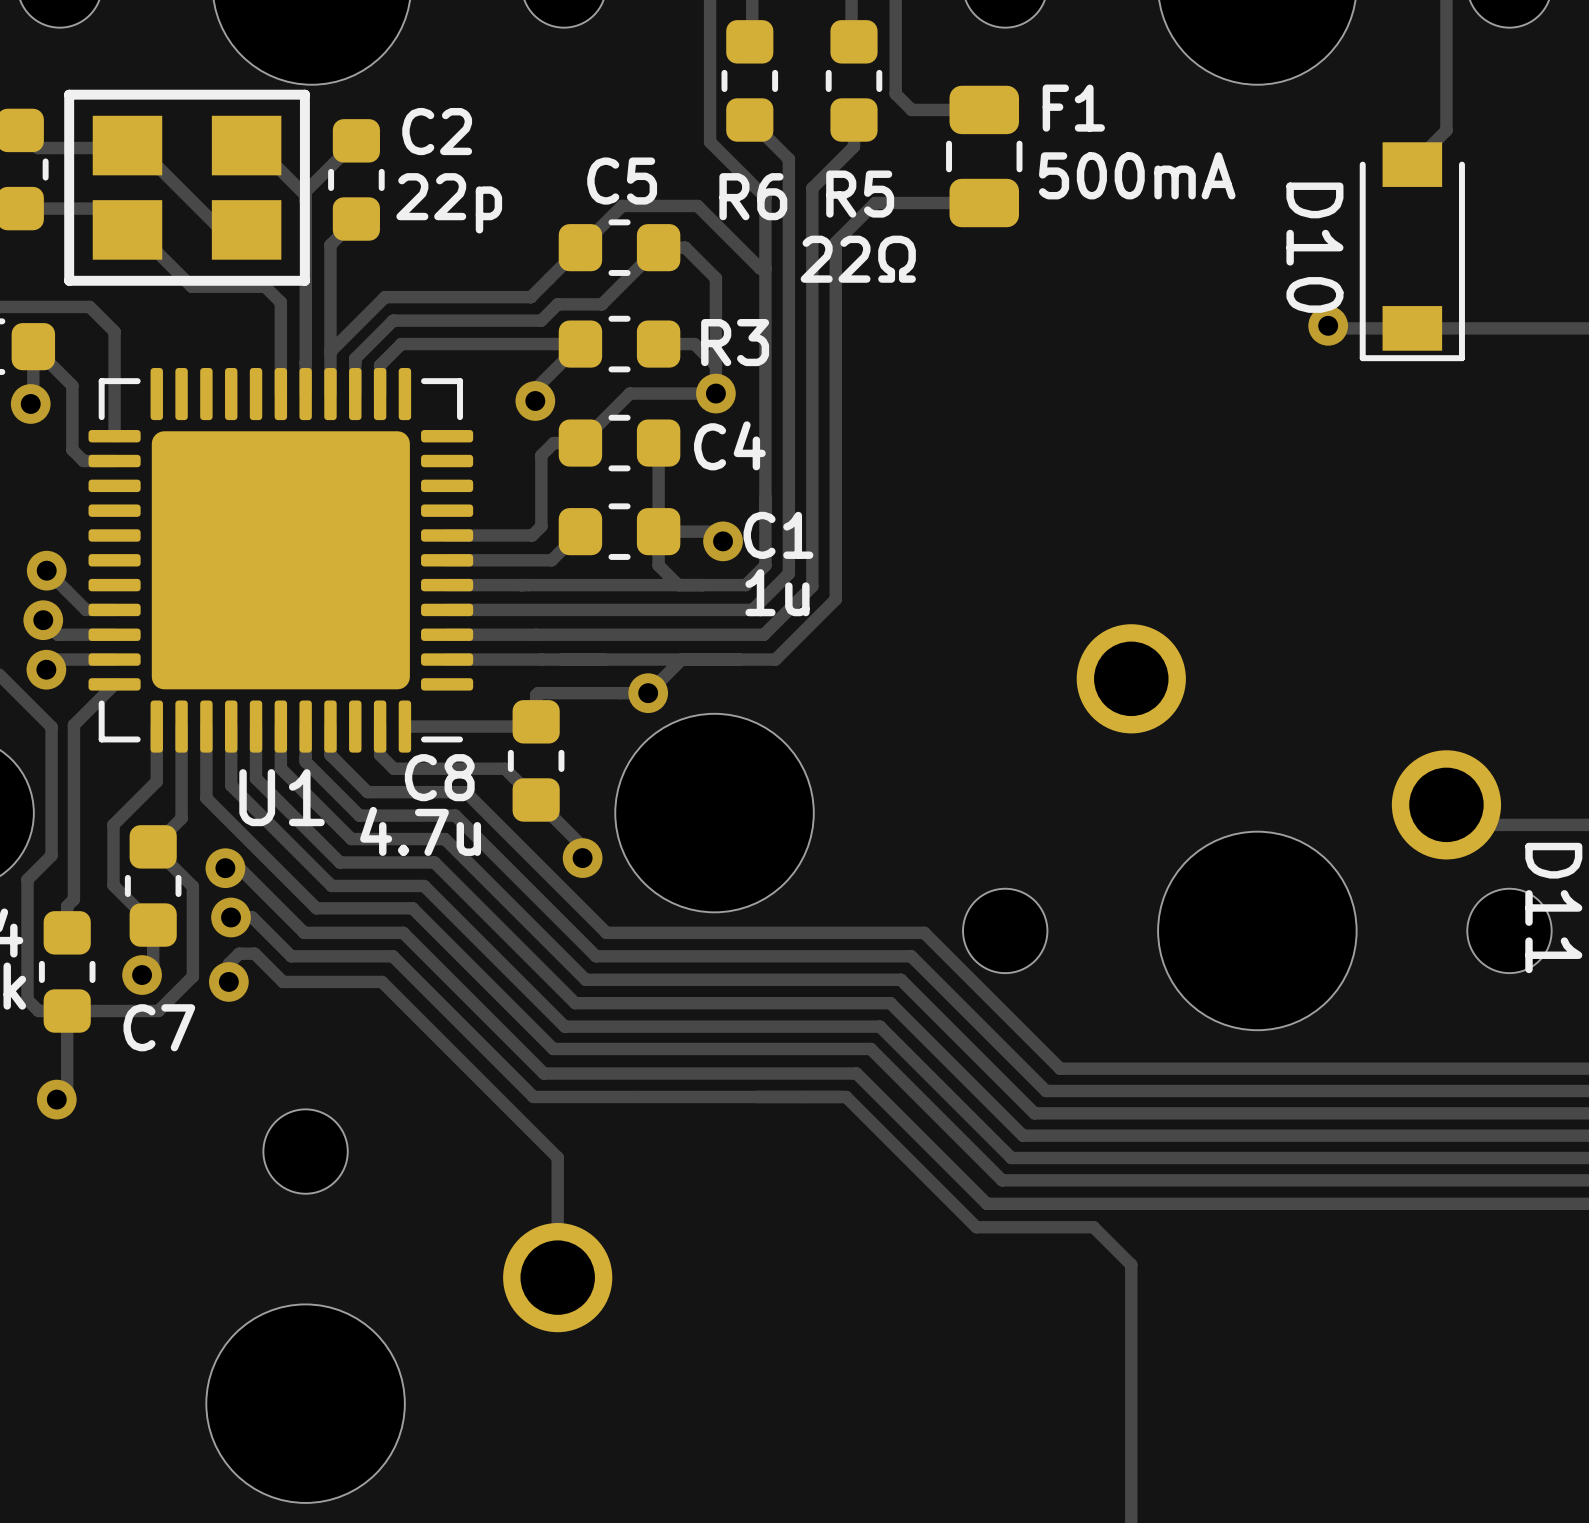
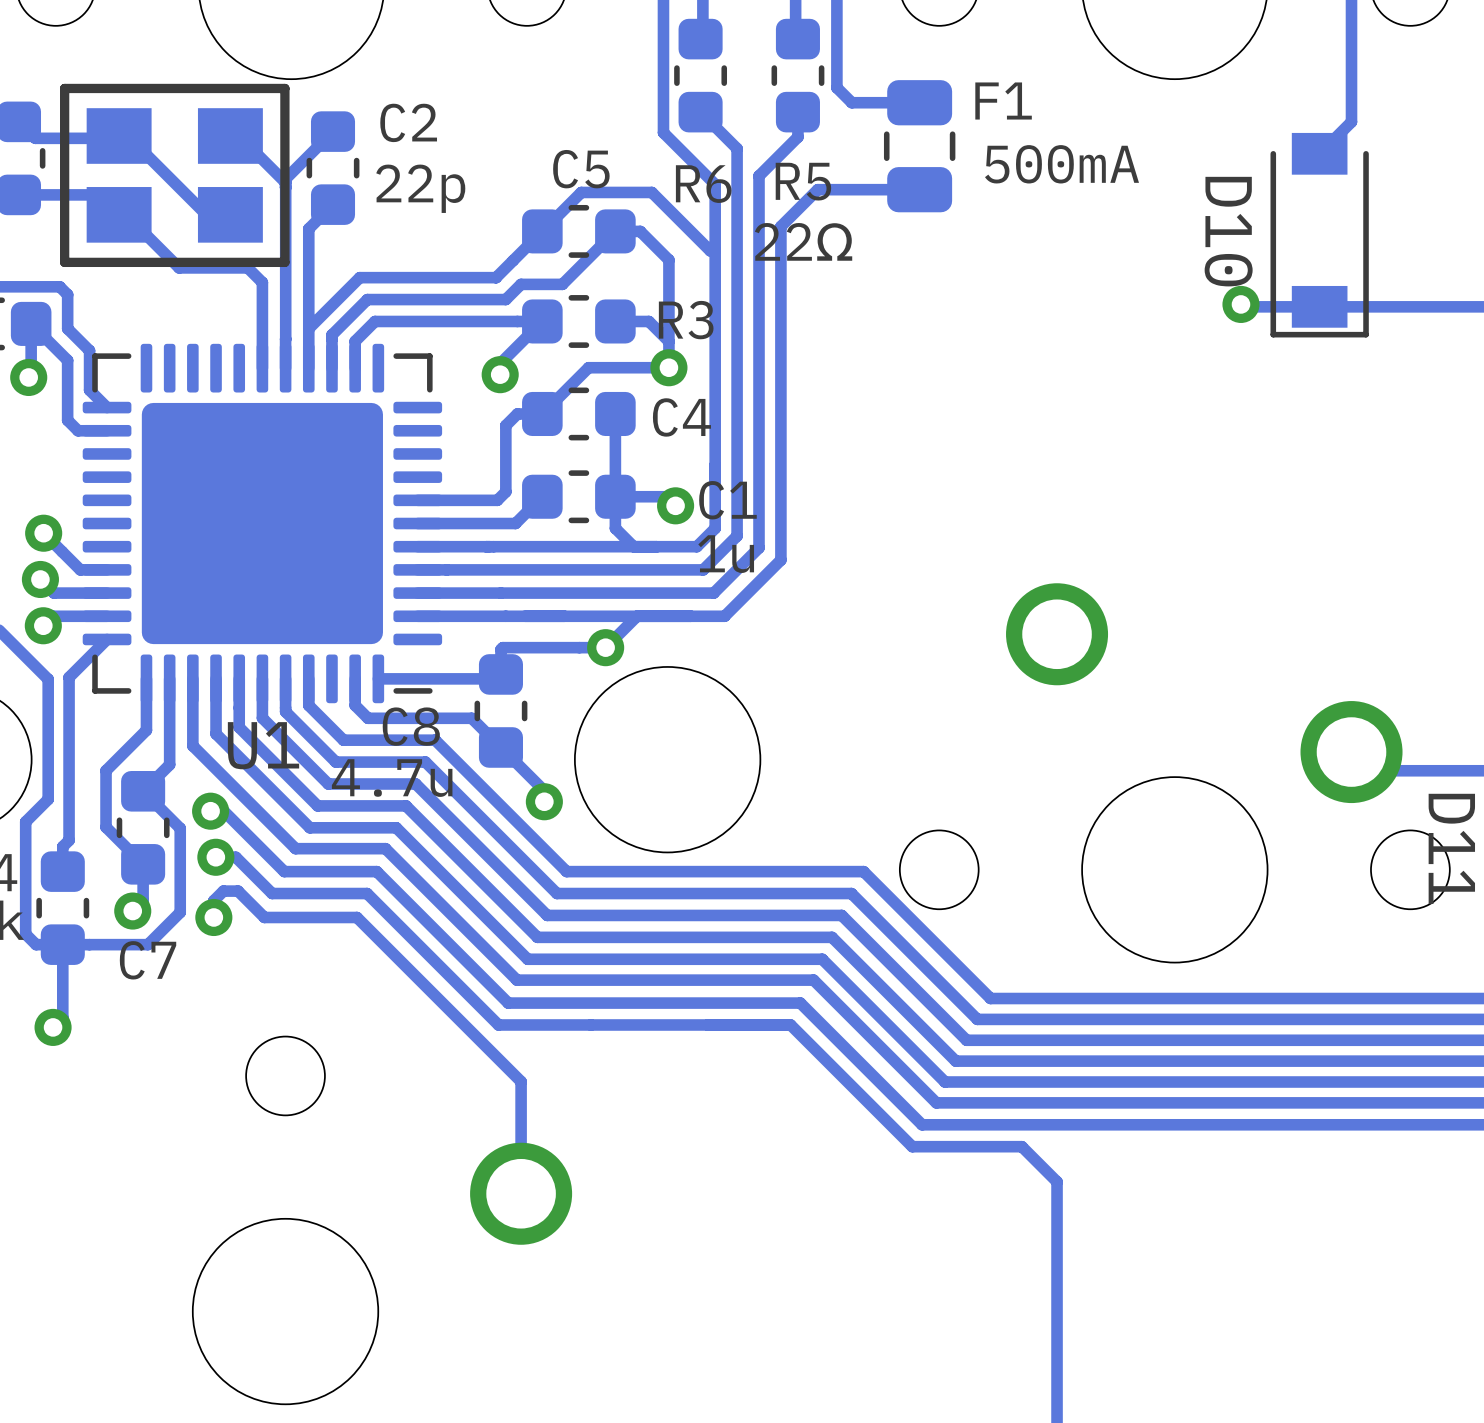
track: (63, 306) (89, 306) (114, 331) (114, 436) -> (59, 286) (67, 294) (67, 328) (89, 350) (89, 390) (107, 407)

